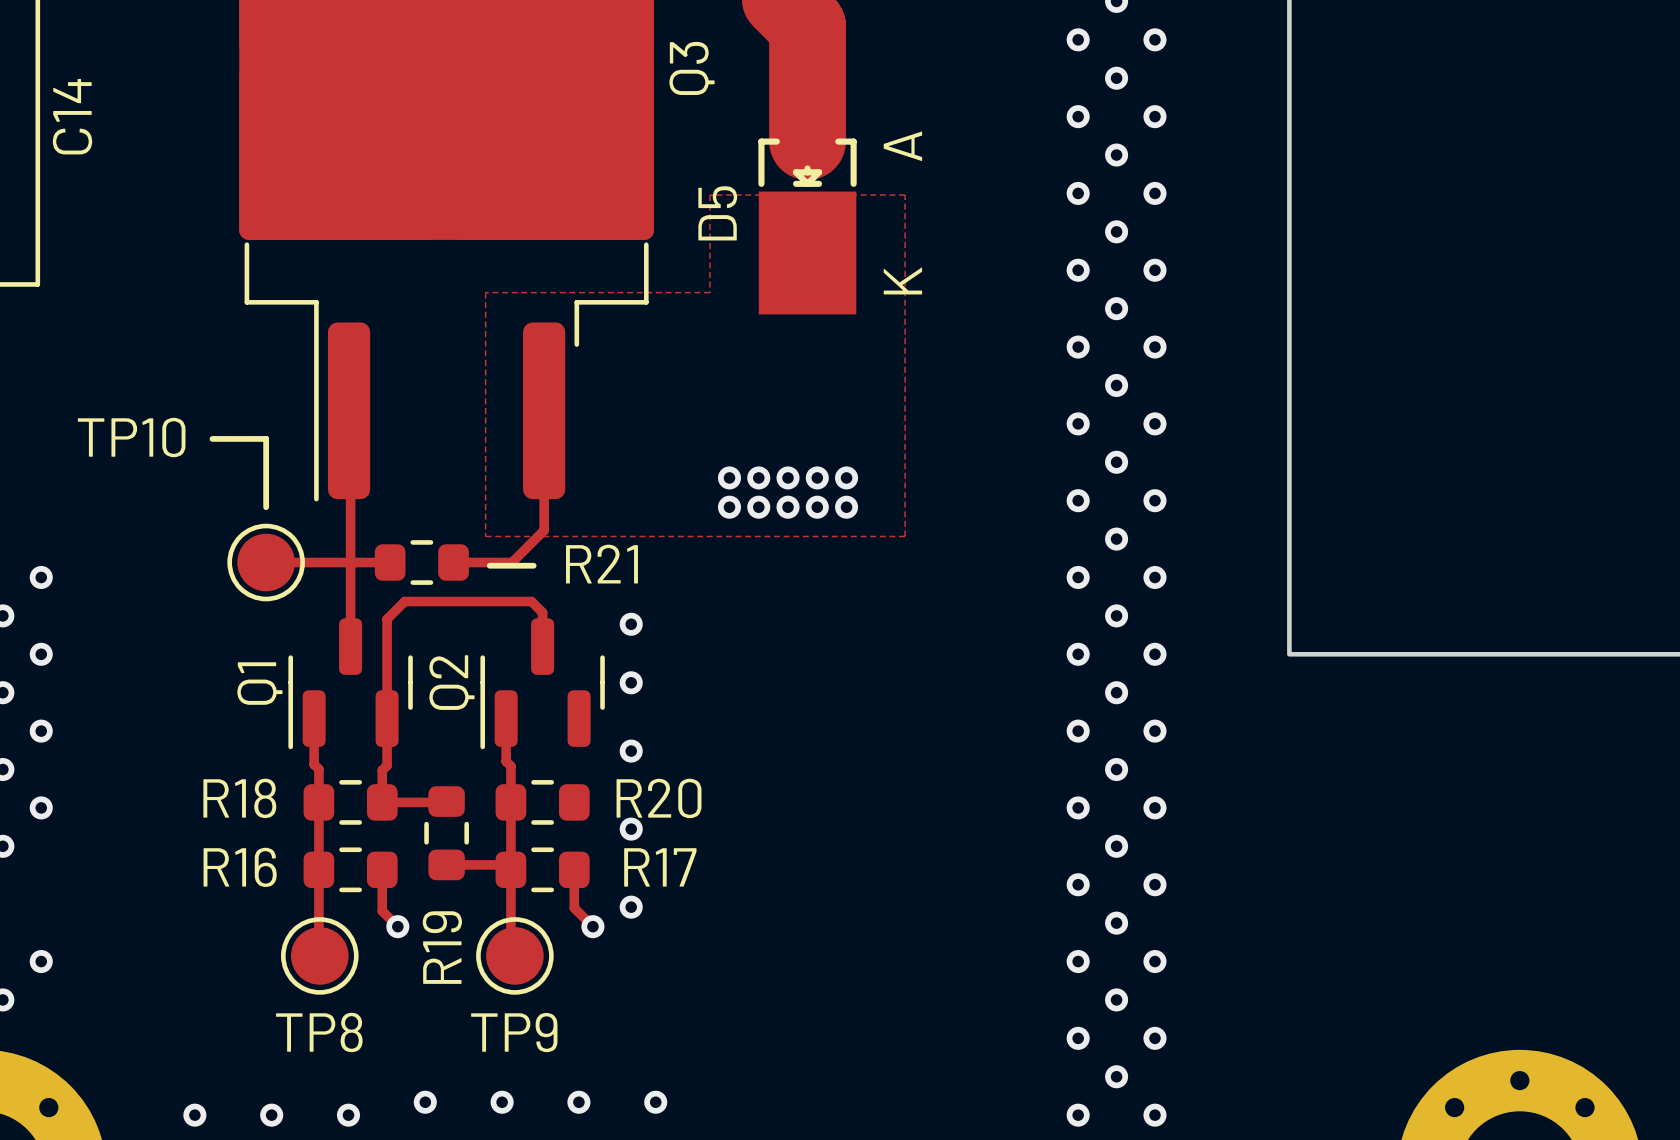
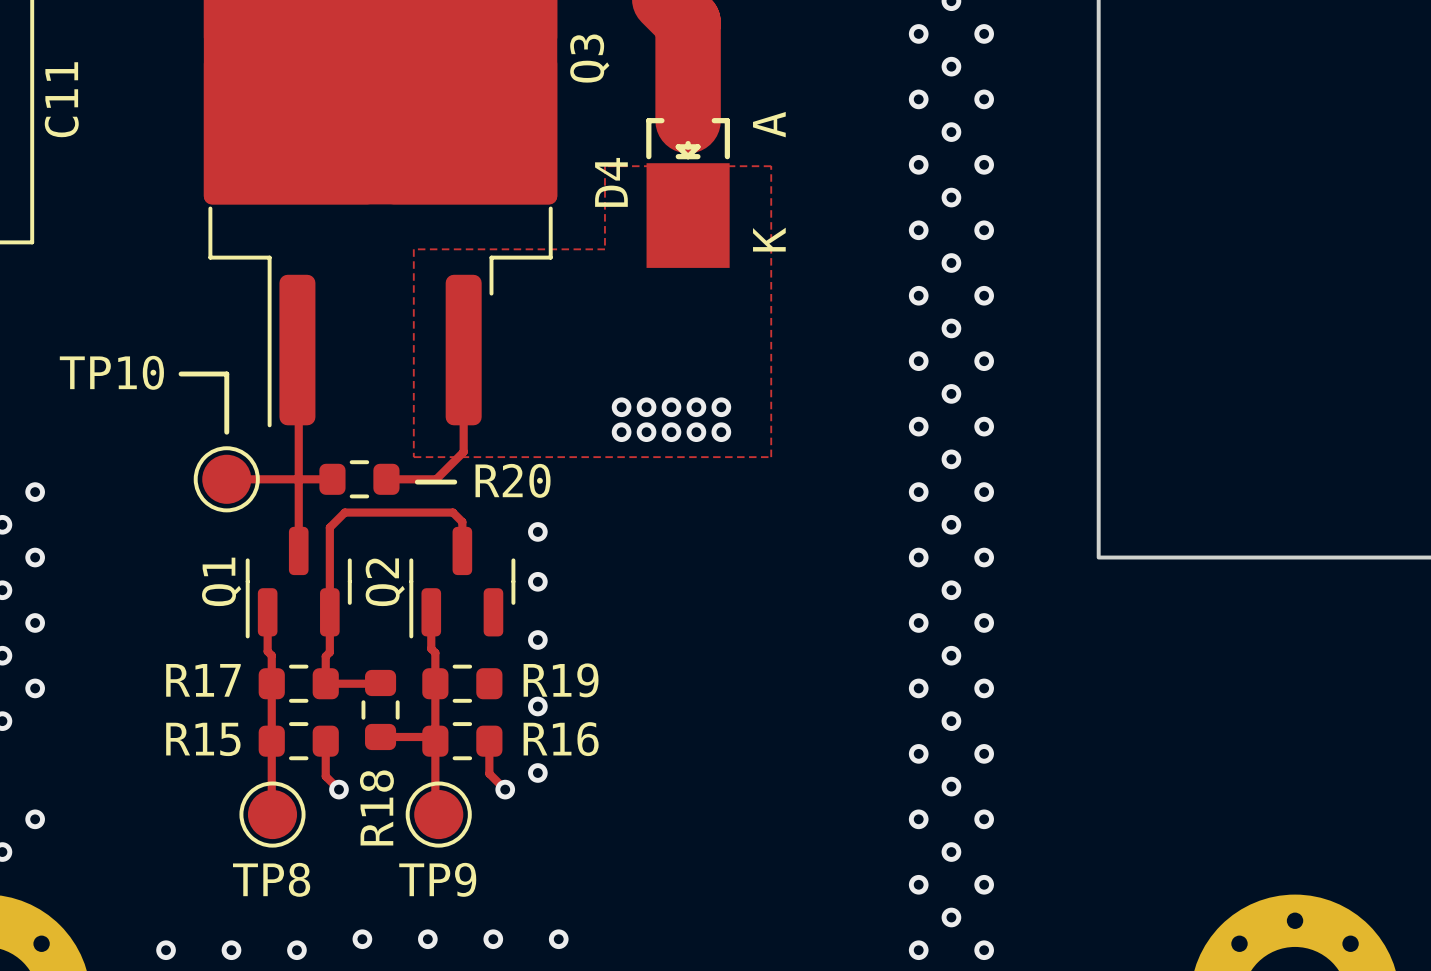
C14 name: C14 (72, 116) -> C11 (61, 99)
D5 name: D5 (717, 213) -> D4 (611, 182)
R21 name: R21 (601, 564) -> R20 (513, 480)
R18 name: R18 (239, 798) -> R17 (203, 680)
R20 name: R20 (659, 798) -> R19 (561, 680)
R16 name: R16 (240, 867) -> R15 (203, 739)
R17 name: R17 (660, 867) -> R16 (561, 739)
R19 name: R19 (442, 947) -> R18 (376, 807)

